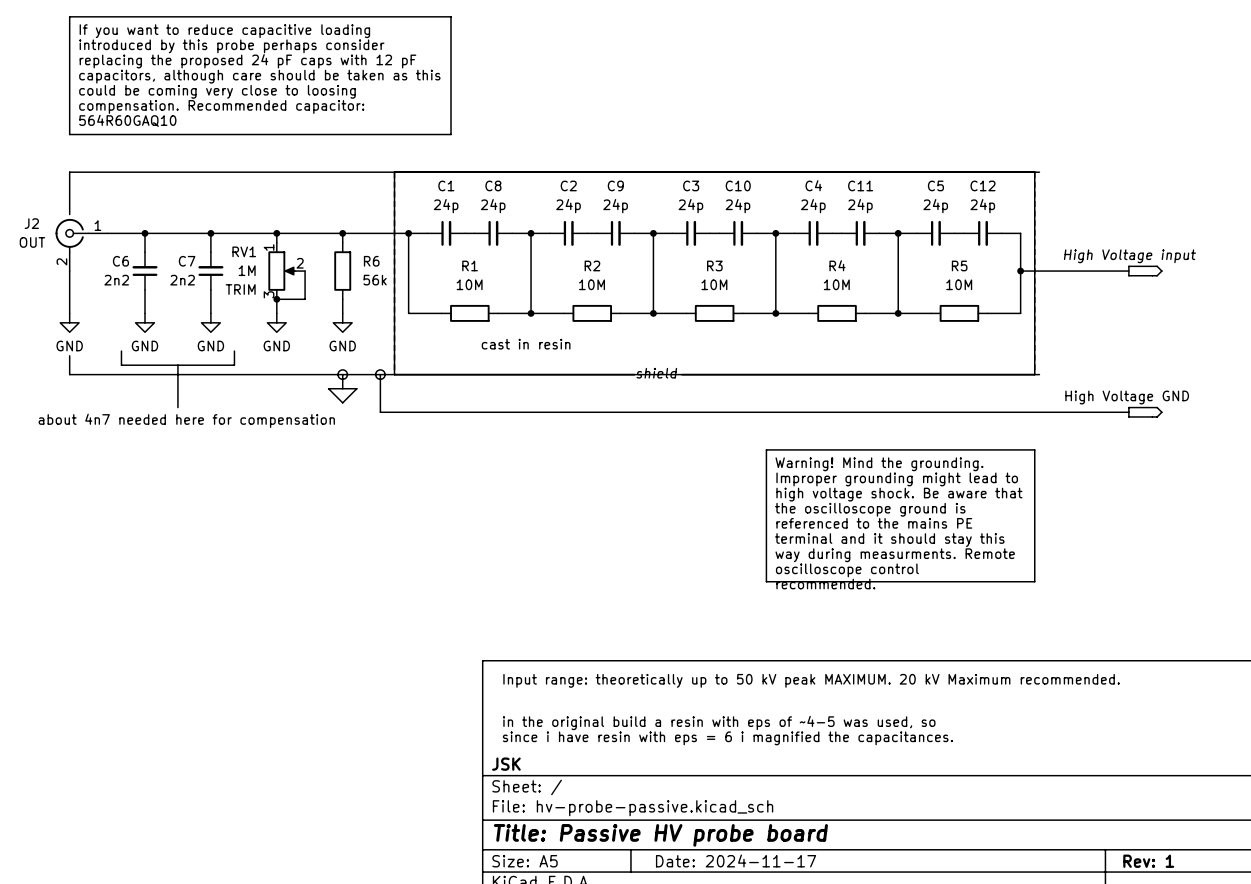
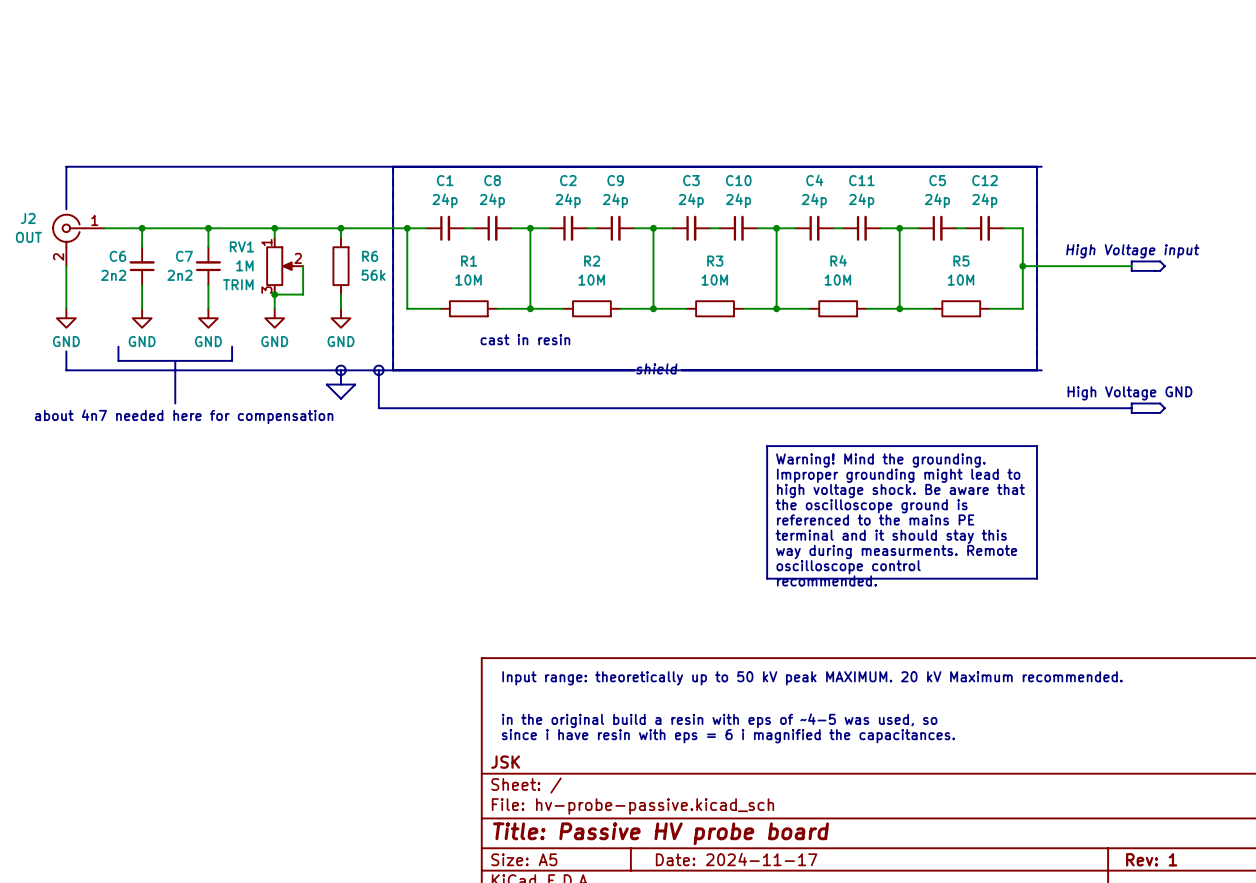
line: (69, 16) (451, 16) (451, 134) (69, 134) (69, 16) -> none
text: If you want to reduce capacitive loading (224, 31) -> none
text: introduced by this probe perhaps consider (231, 46) -> none
text: replacing the proposed 24 pF caps with 12 pF (247, 61) -> none
text: capacitors, although care should be taken as this (259, 76) -> none
text: could be coming very close to loosing (217, 91) -> none
text: compensation. Recommended capacitor: (221, 106) -> none
text: 564R60GAQ10 (127, 120) -> none

